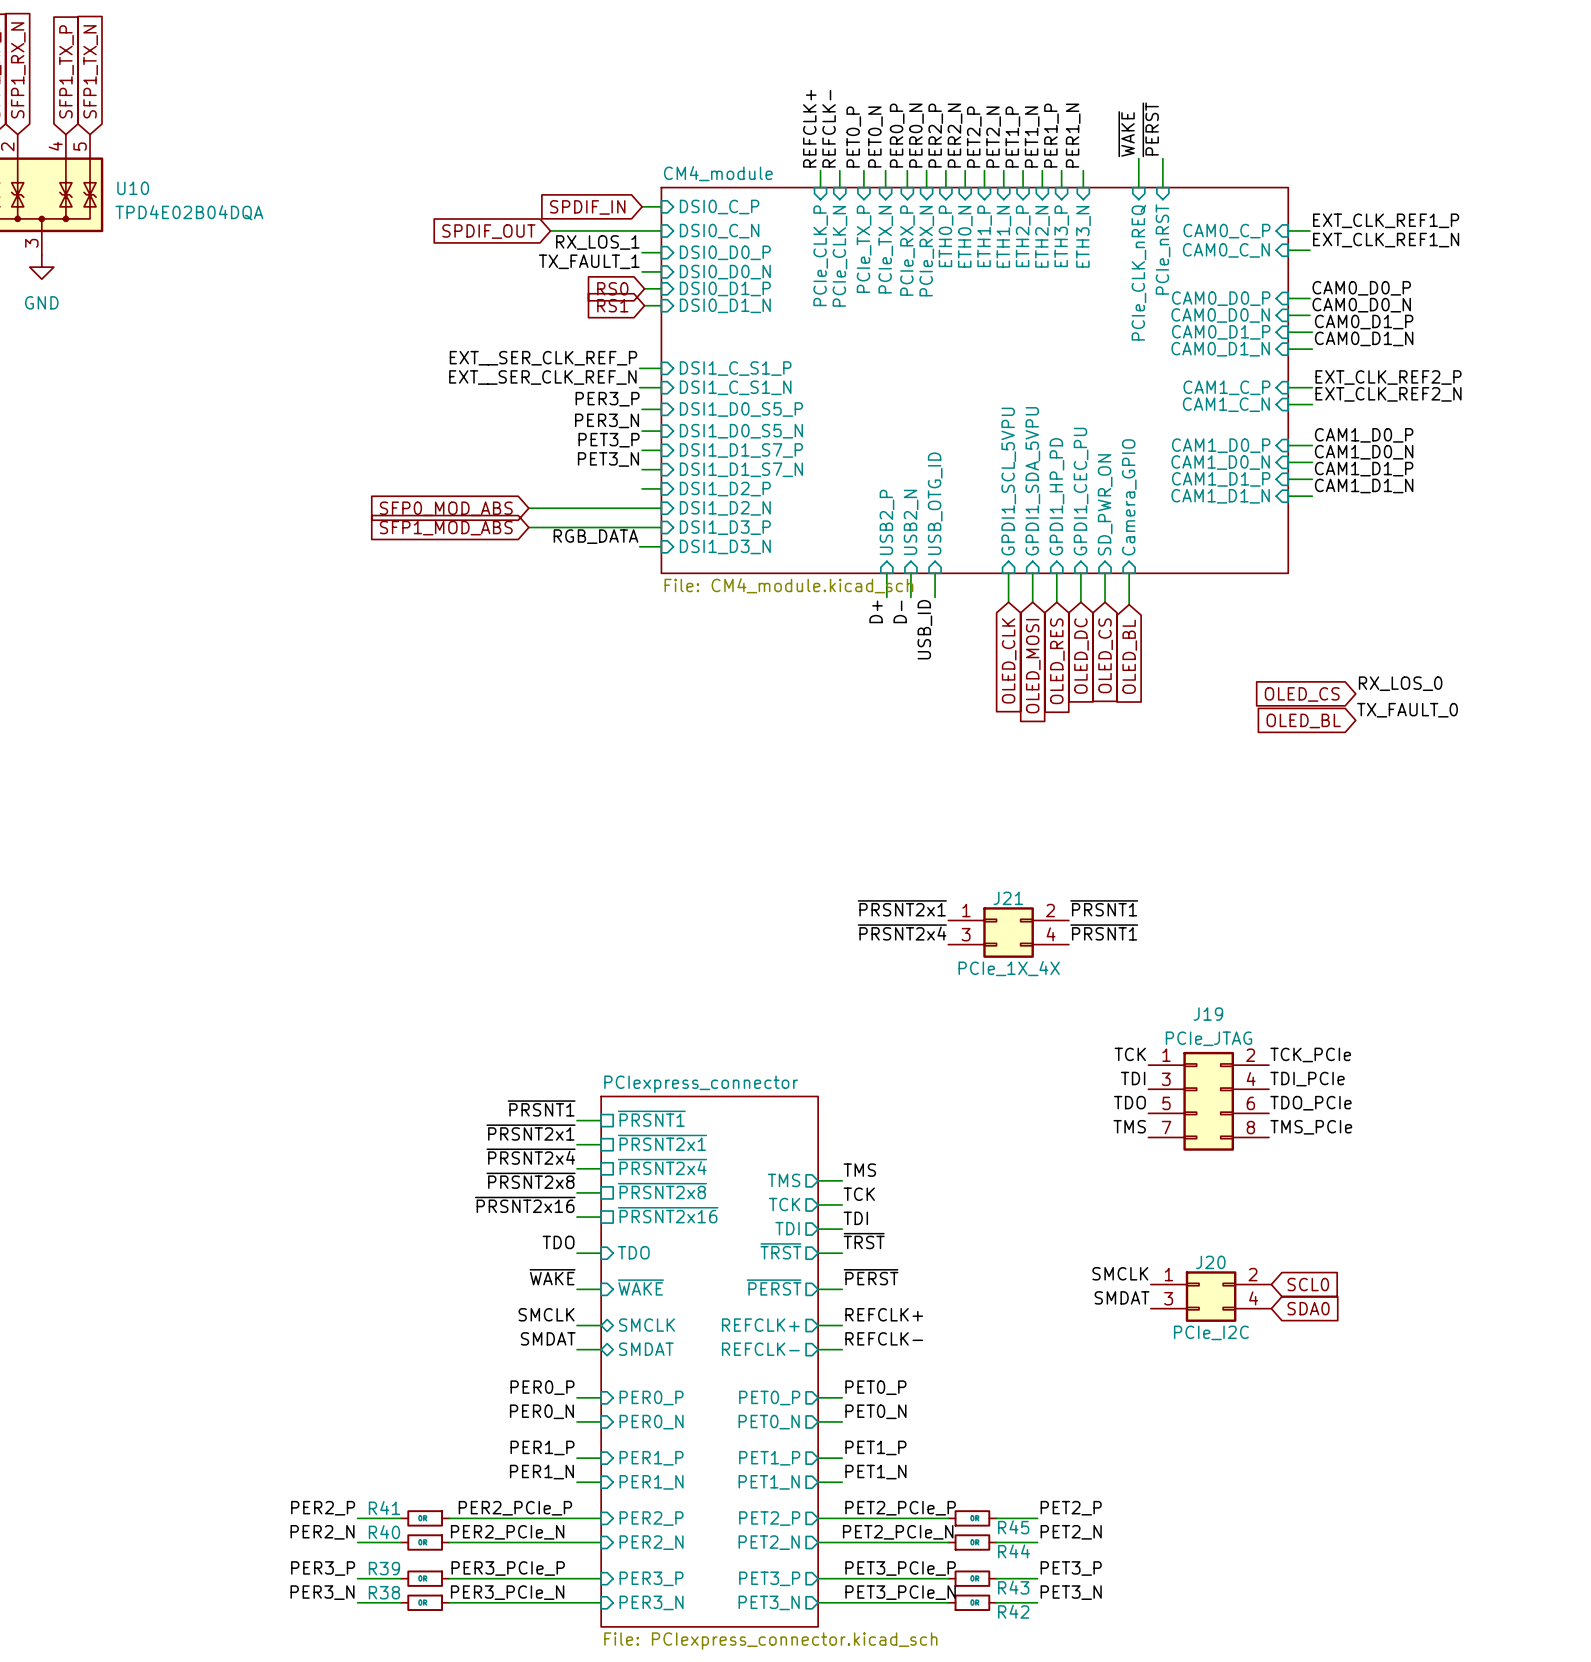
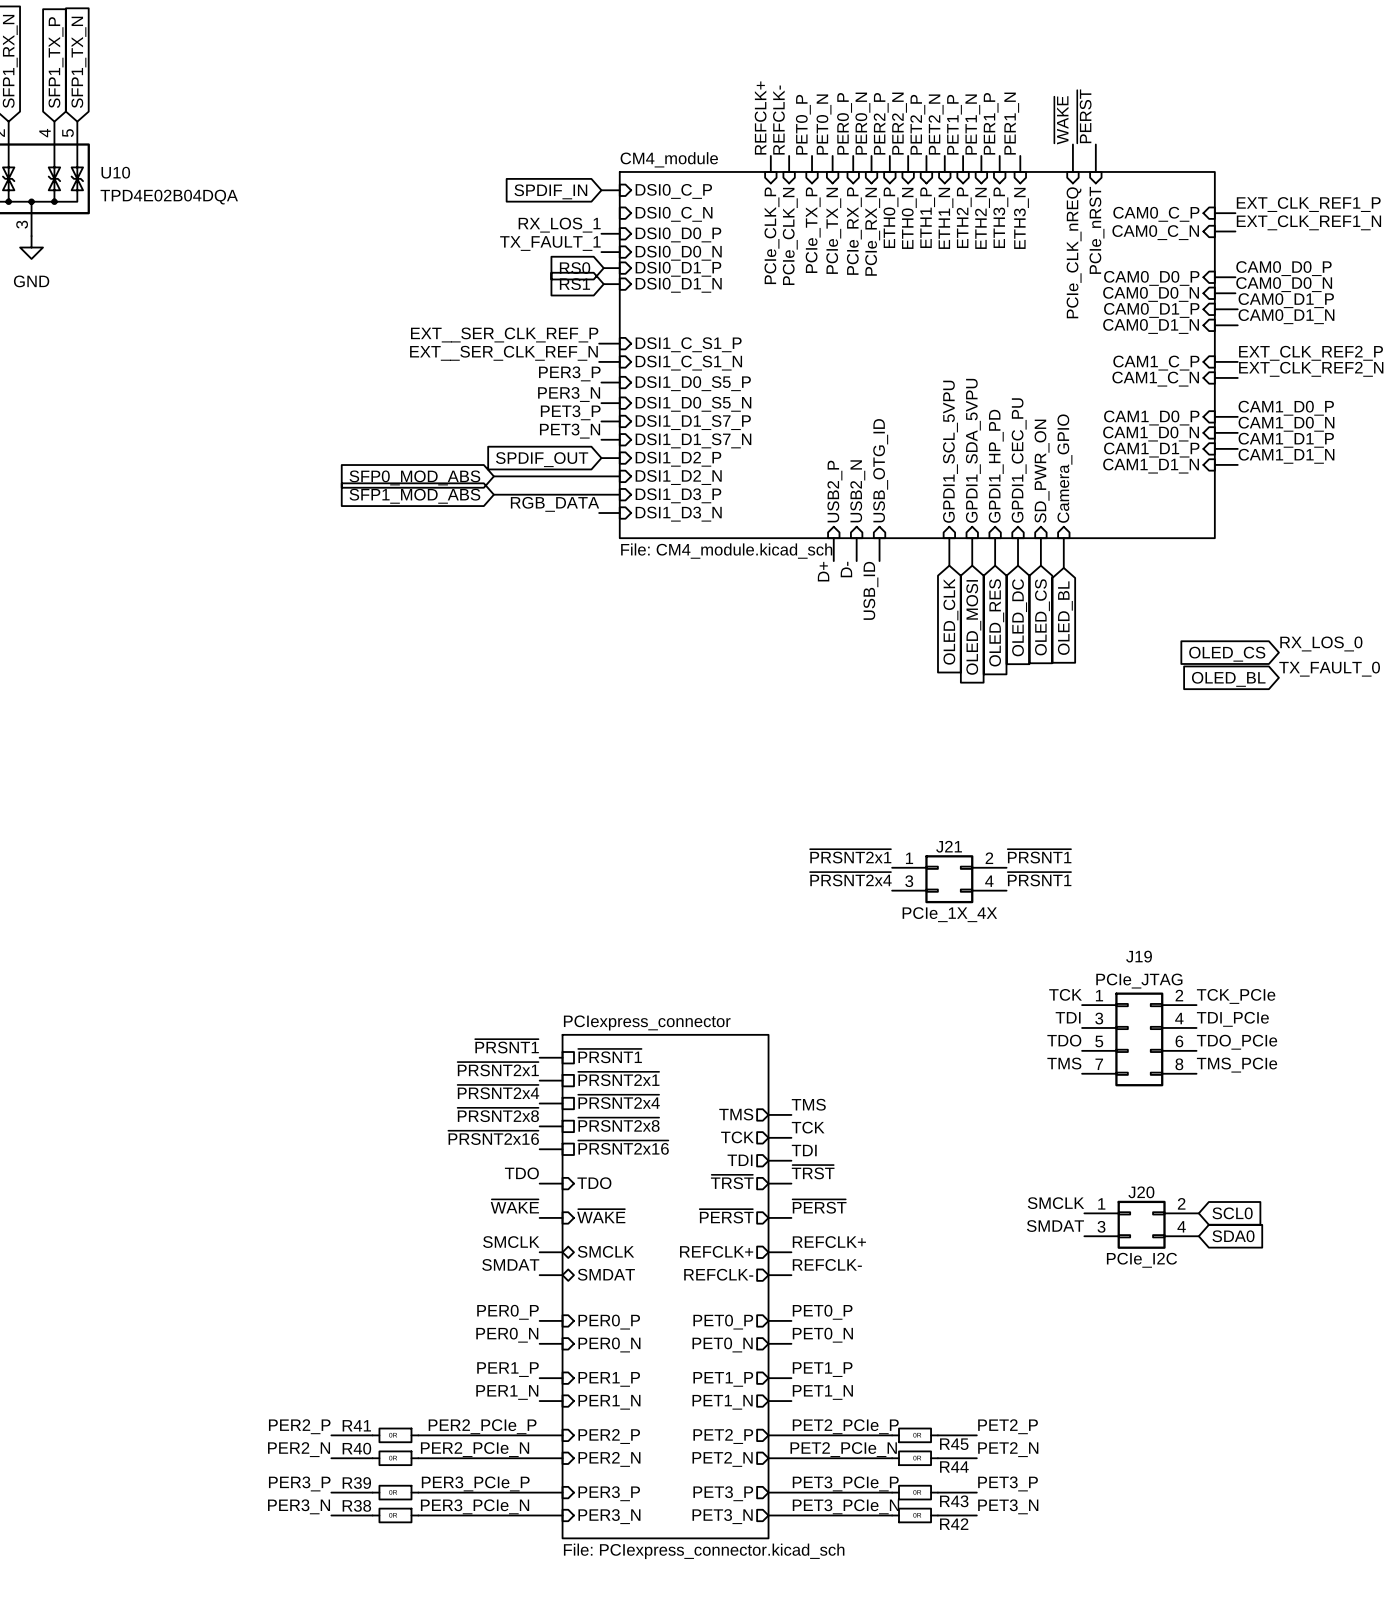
wire: (550, 230) (661, 230) -> none
global label: SPDIF_OUT (488, 231) -> none
global label: none -> SPDIF_OUT (542, 459)

